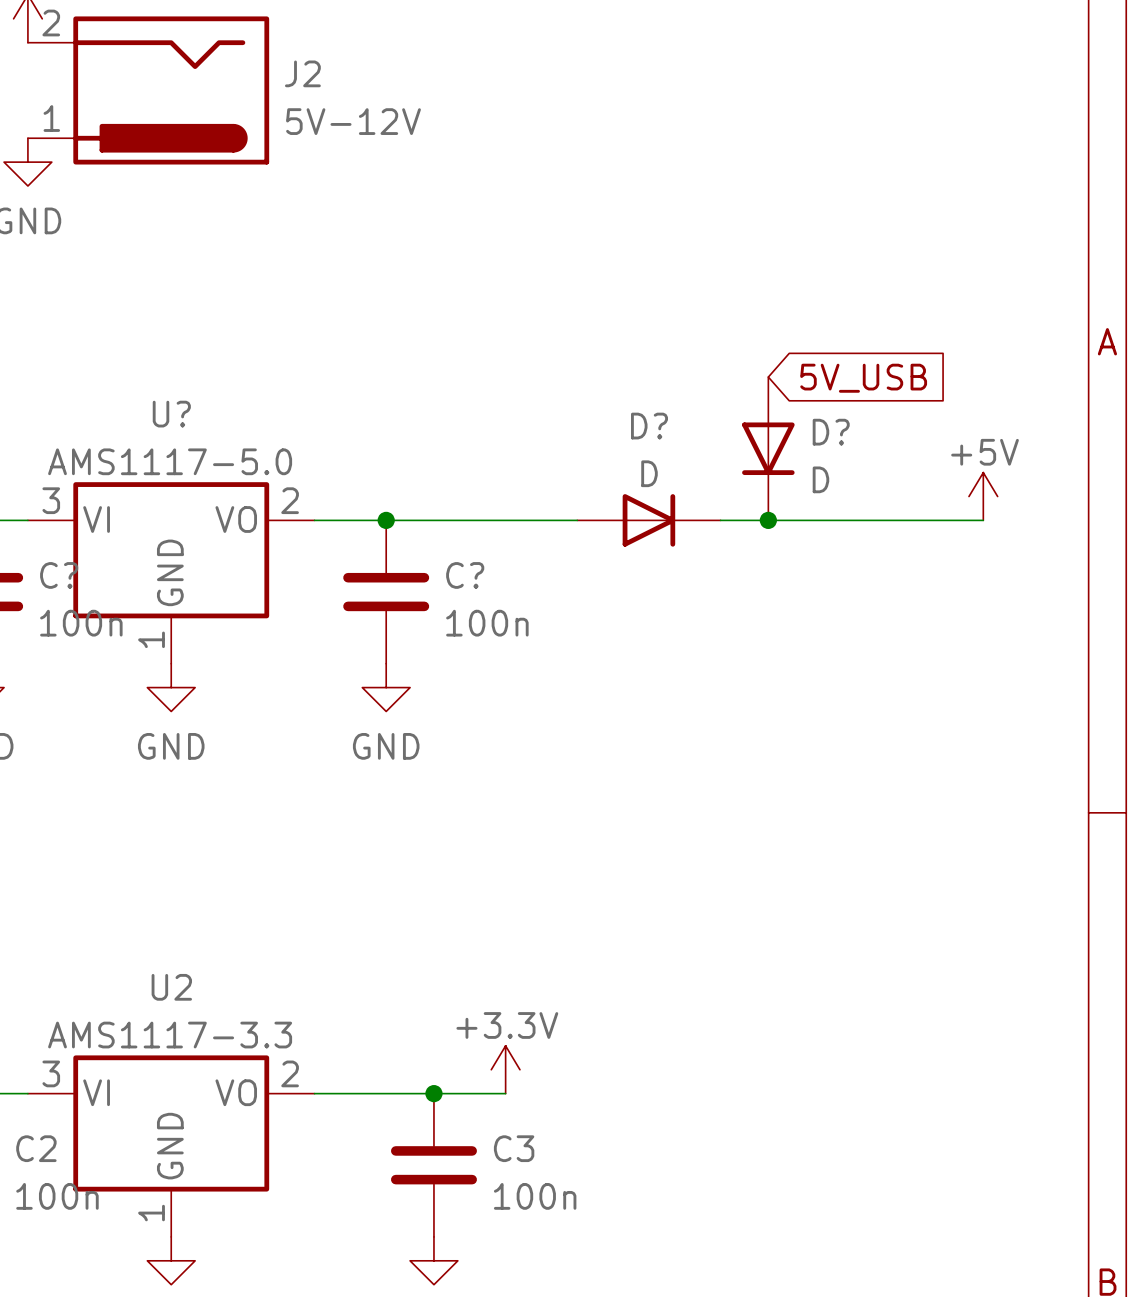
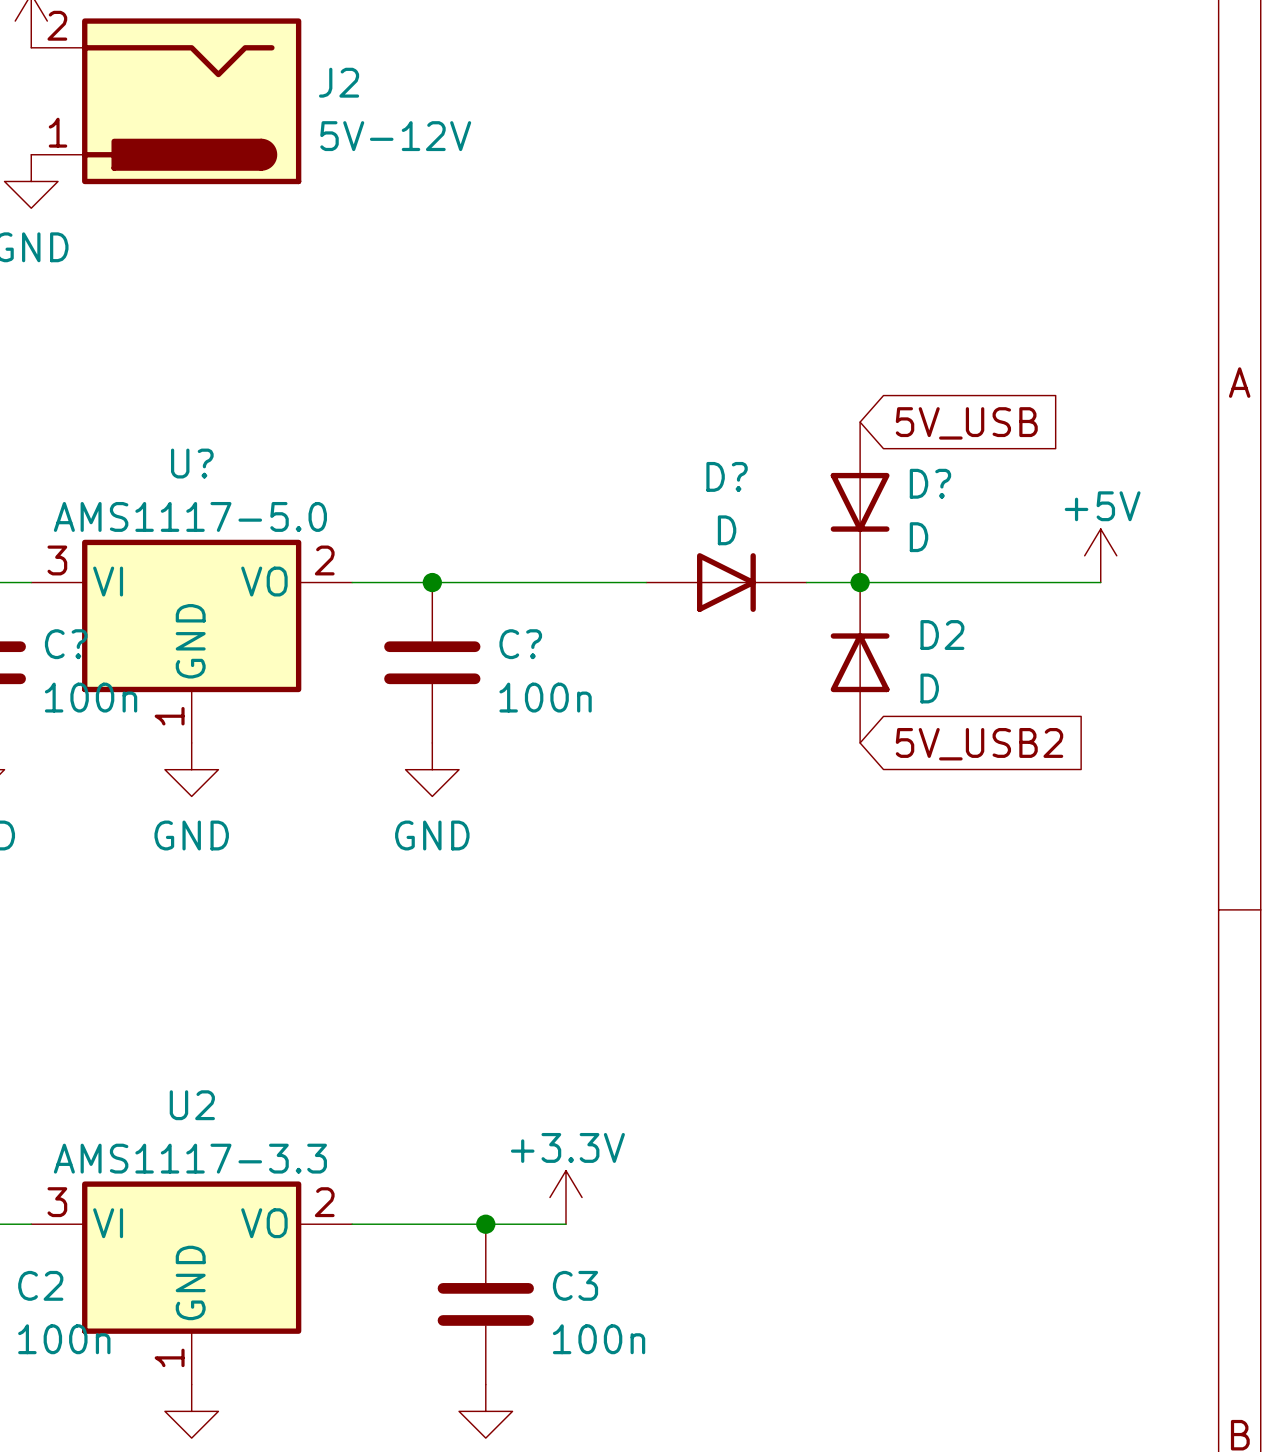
D2: none -> D (860, 662)
global label: none -> 5V_USB2 (979, 744)

